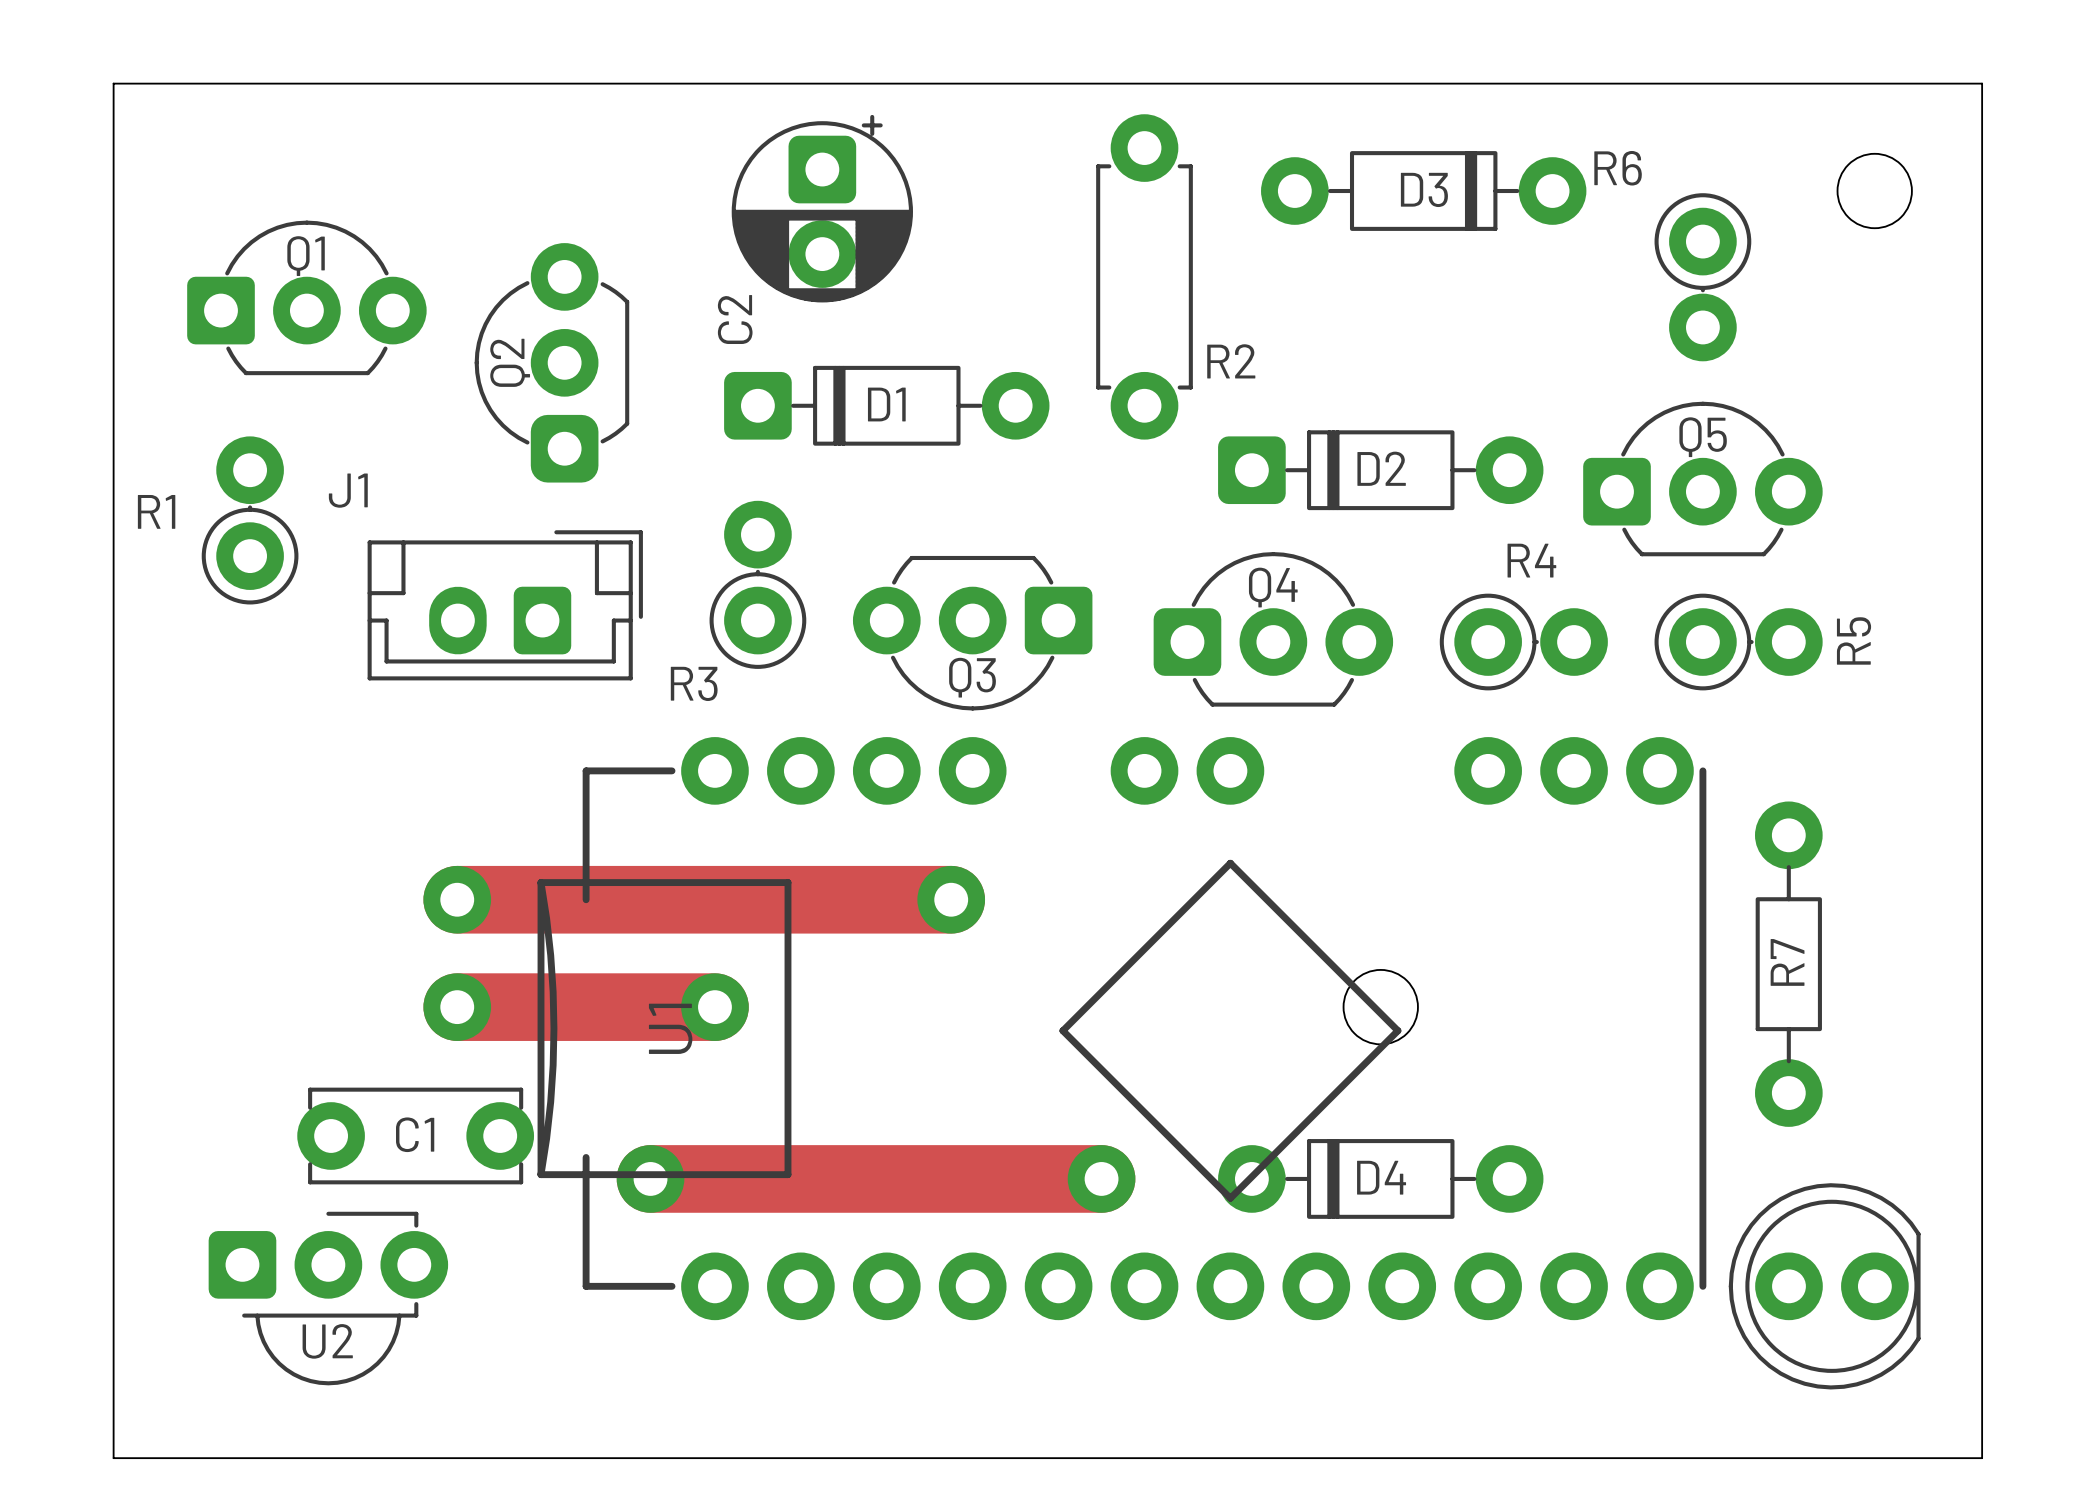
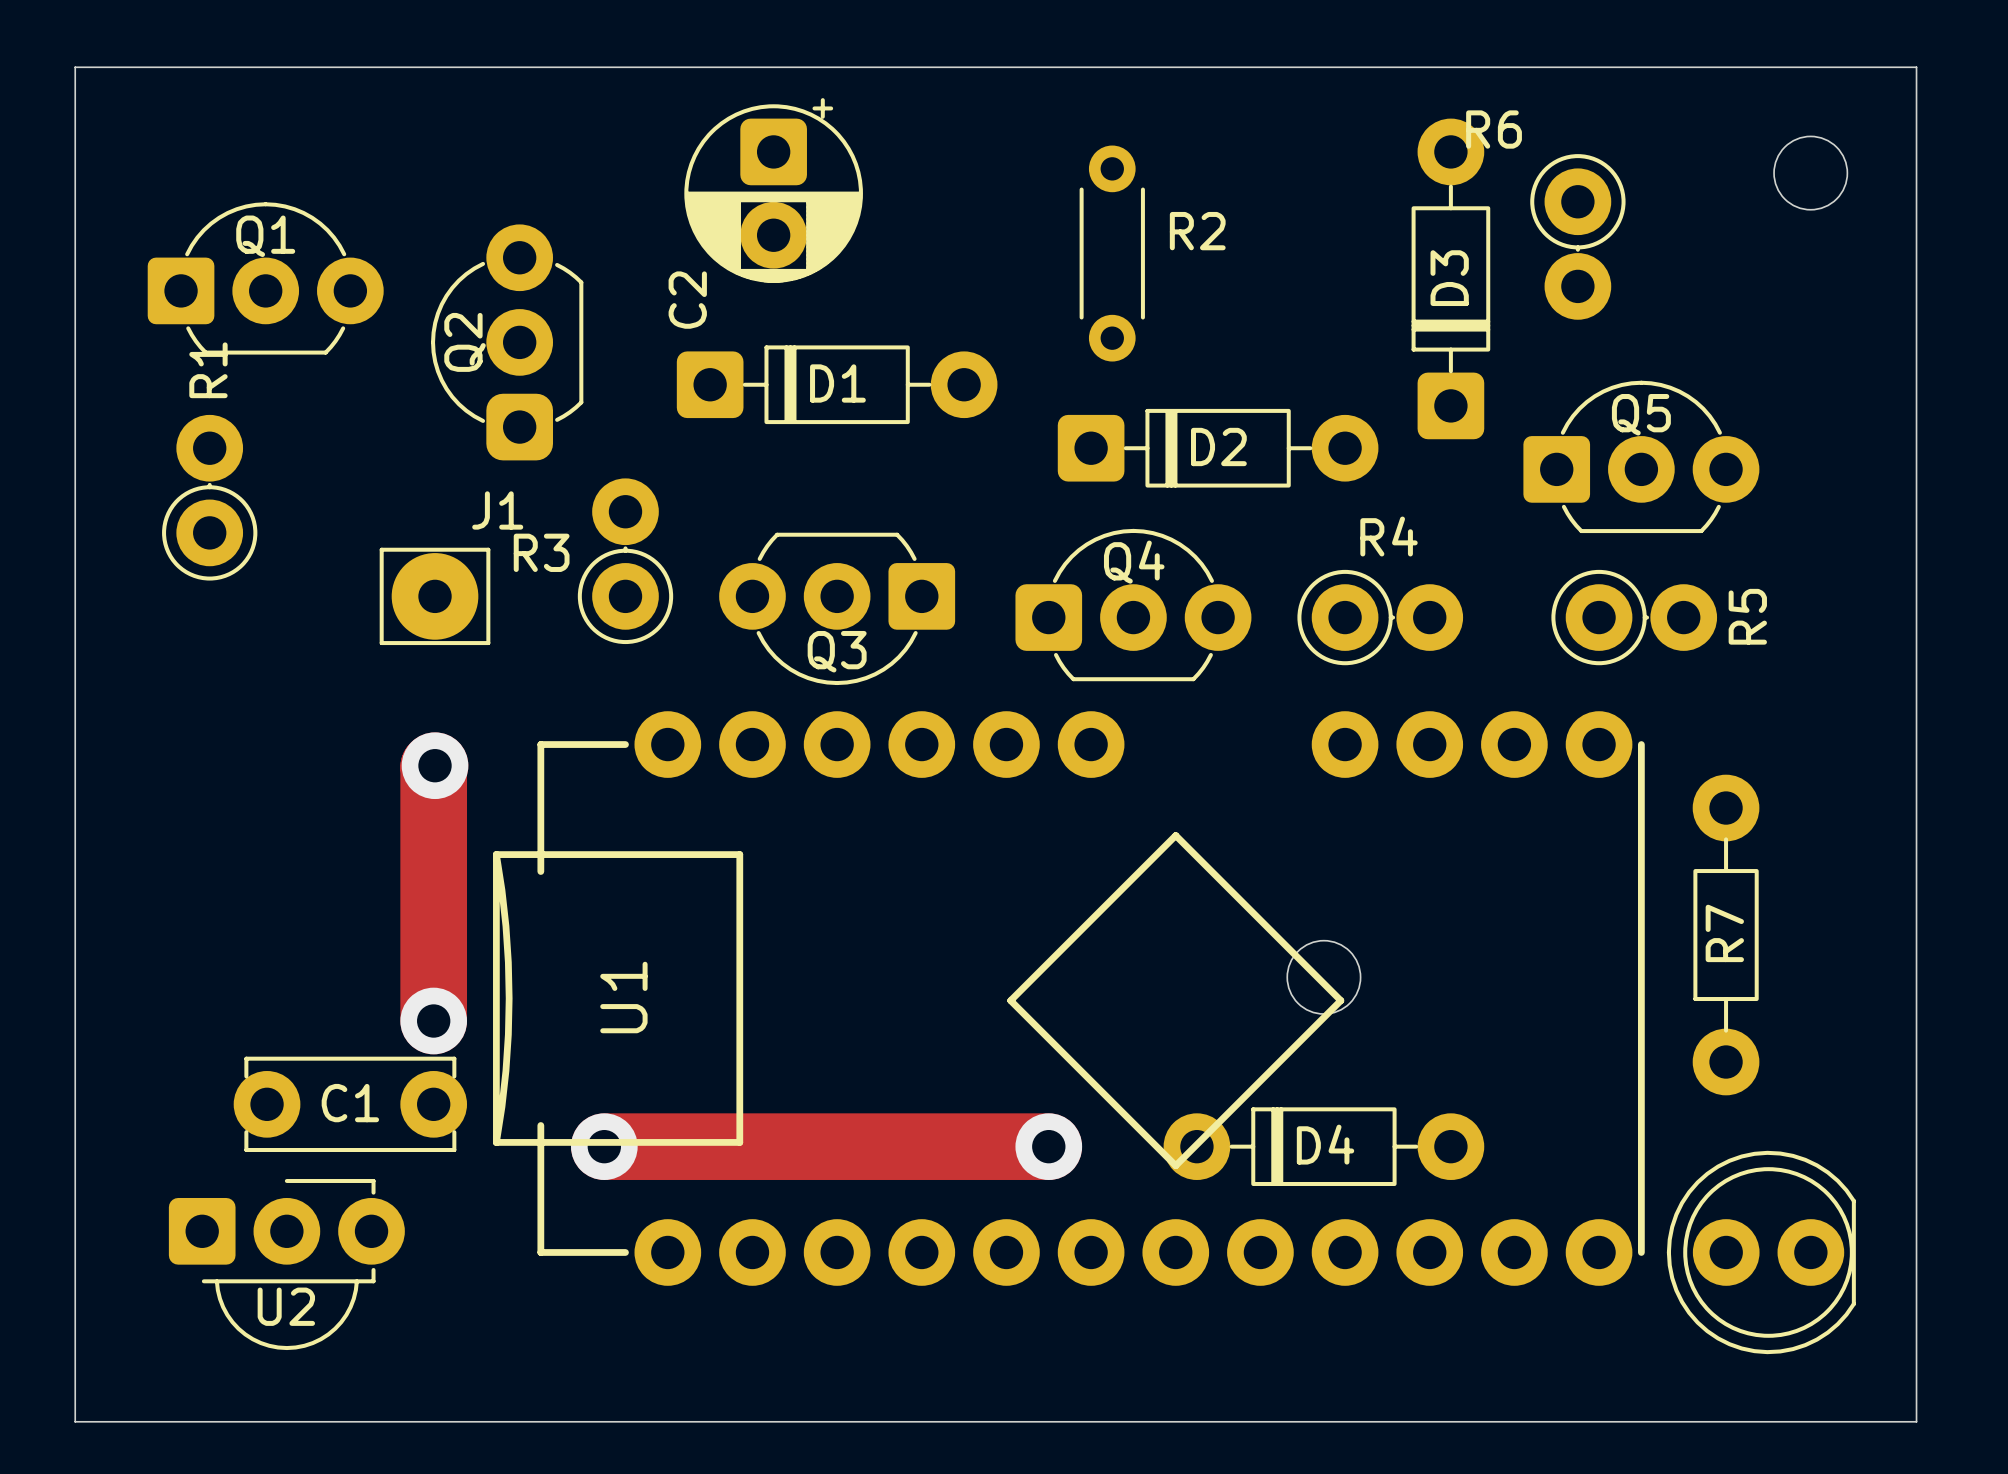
R2 footprint: [1096, 114, 1193, 440] -> [1079, 145, 1145, 362]
D3 footprint: [1261, 151, 1587, 231] -> [1411, 118, 1491, 440]
R6 position: (1702, 277) -> (1577, 236)
R2 name position: R2 (1231, 361) -> R2 (1197, 231)
D2 position: (1380, 470) -> (1218, 448)
J1 name position: J1 (348, 490) -> J1 (497, 510)
R1 name rotation: 0° (156, 511) -> 90° counterclockwise (208, 370)
R1 name position: R1 (156, 511) -> R1 (208, 370)
J1 footprint: [367, 530, 643, 681] -> [379, 547, 491, 646]
R3 position: (757, 584) -> (625, 561)
Q4 position: (1273, 629) -> (1133, 605)
Q3 position: (972, 633) -> (837, 608)
R4 position: (1523, 642) -> (1380, 617)
R5 position: (1738, 642) -> (1634, 617)
R3 name position: R3 (694, 683) -> R3 (541, 552)
U1 footprint: [537, 737, 1707, 1321] -> [493, 711, 1645, 1286]
track: none -> (435, 765) (433, 1021)
via: none -> (435, 765)
track: (457, 899) (951, 899) -> none
via: (457, 899) -> none
via: (951, 899) -> none
track: (457, 1007) (714, 1007) -> none
via position: (457, 1007) -> (433, 1021)
via: (714, 1007) -> none
C1 position: (415, 1135) -> (350, 1104)

